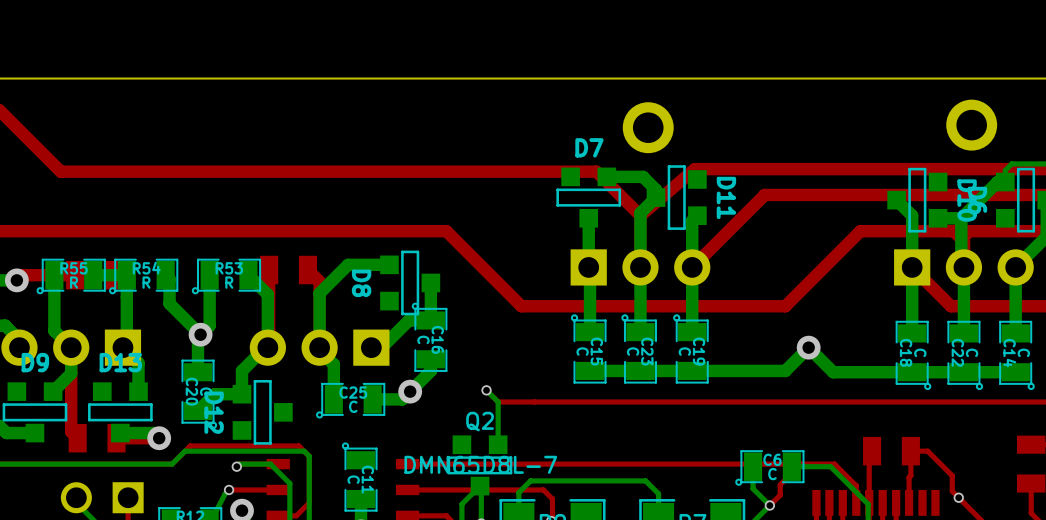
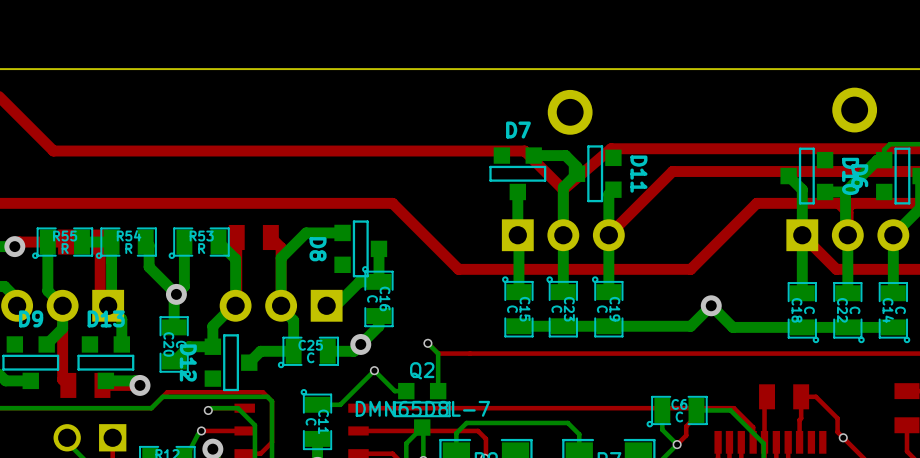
top track: none -> (100, 242) (100, 297) (108, 305)
bottom track: none -> (293, 351) (260, 351) (249, 362)
via: none -> (374, 370)
bottom track: none -> (406, 391) (394, 391) (374, 370) (340, 404) (317, 404)

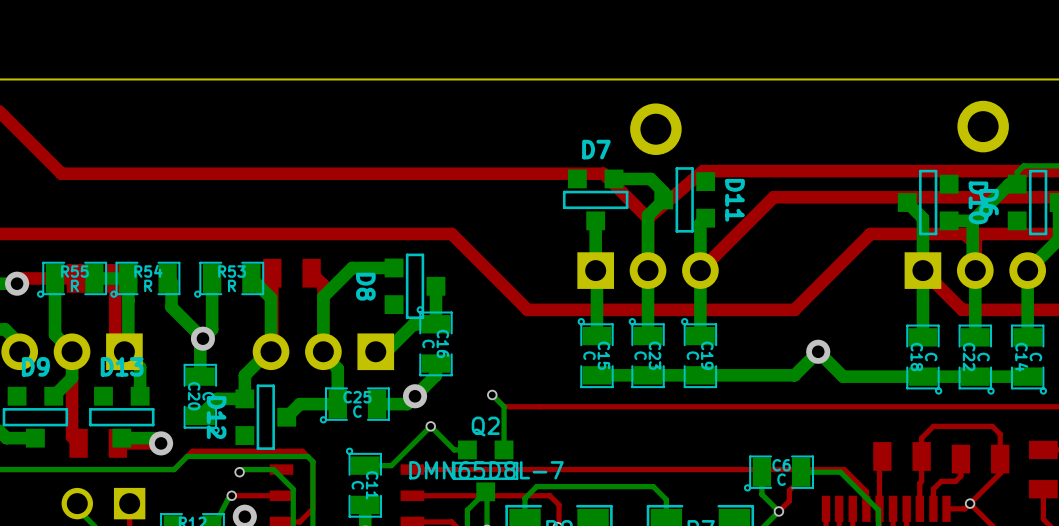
top track: (801, 396) (815, 396) (837, 418) (837, 432) (843, 437) -> (921, 456) (921, 438) (933, 426) (992, 426) (1000, 434) (1000, 473) (964, 508) (946, 508)
top track: none -> (960, 459) (960, 476) (955, 481) (941, 481) (933, 489) (933, 508)
part: none -> (980, 459)

